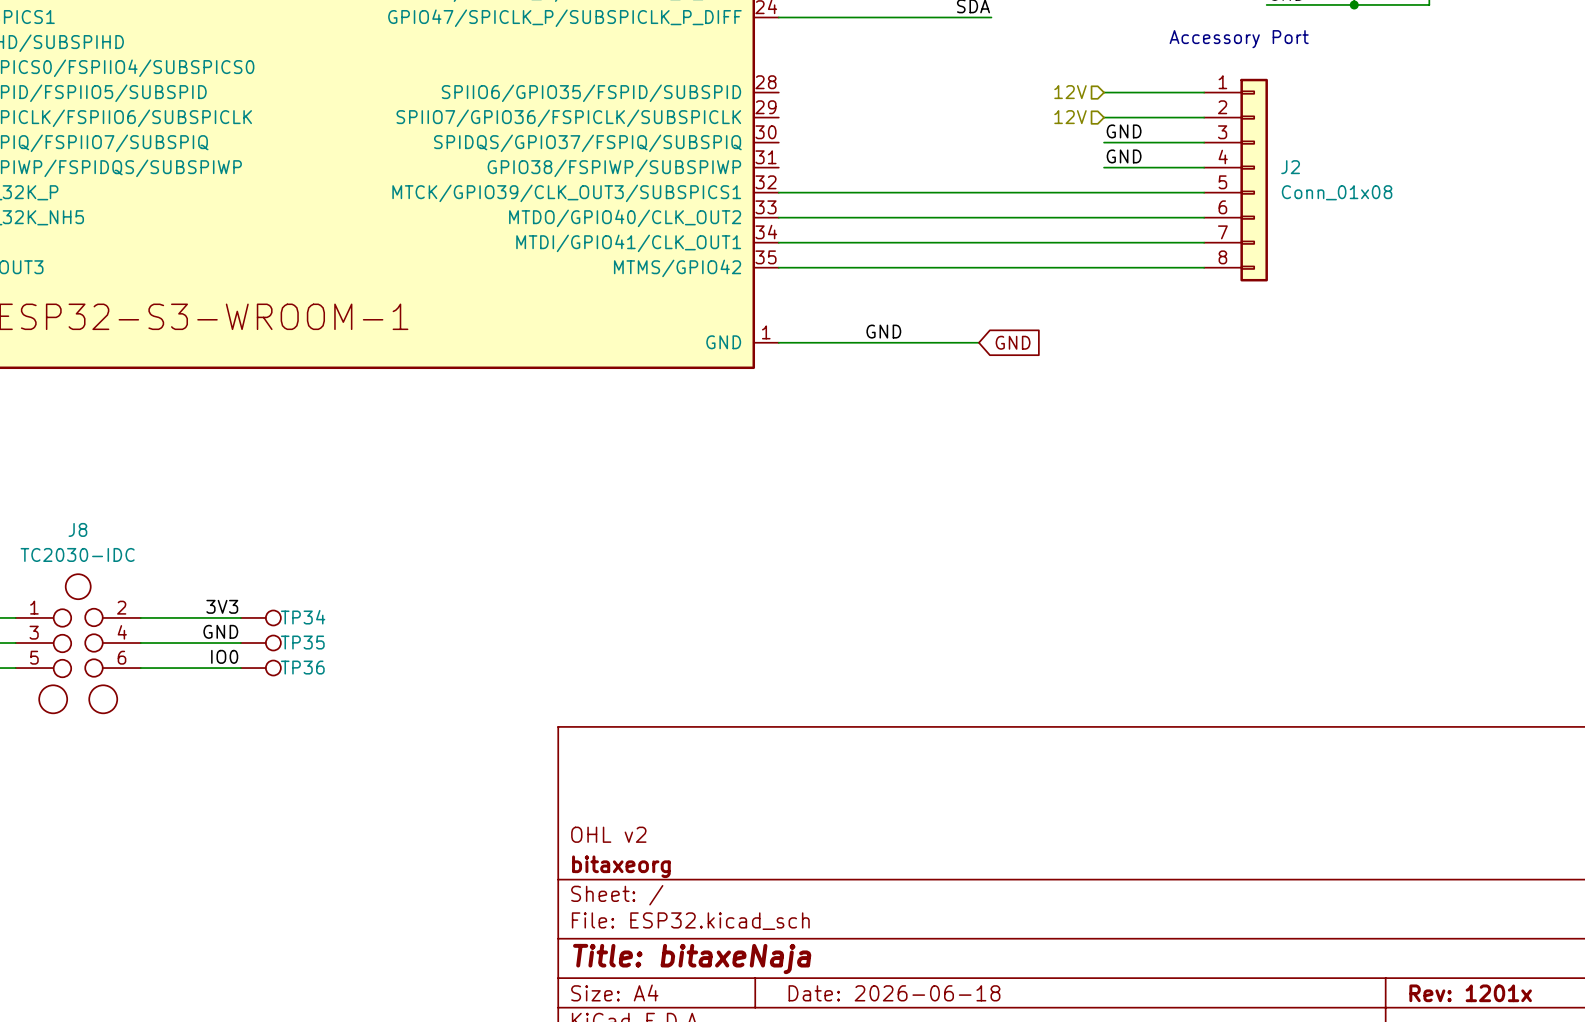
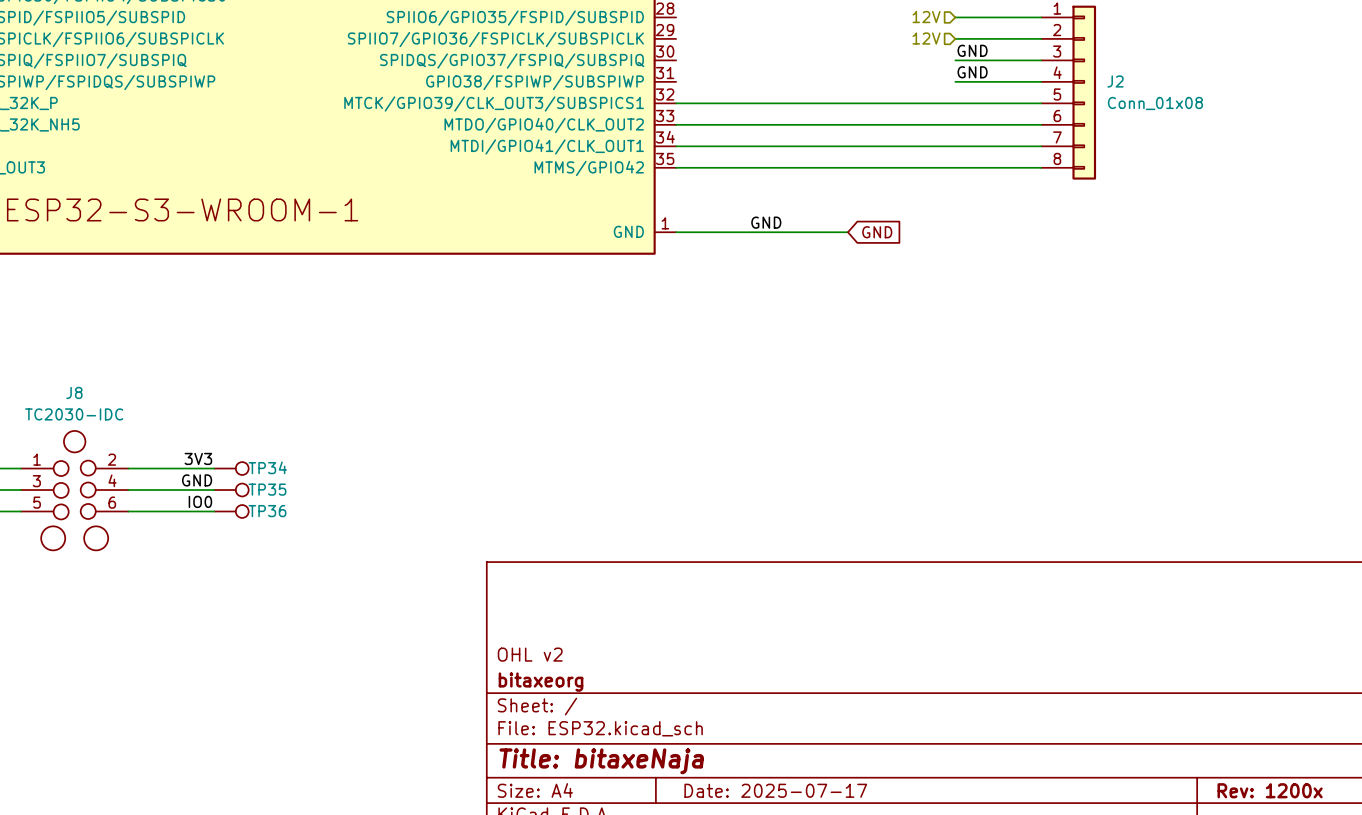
title block: Date: 2026-06-18 (894, 993) -> Date: 2025-07-17 (775, 790)
title block: Rev: 1201x (1470, 993) -> Rev: 1200x (1270, 790)

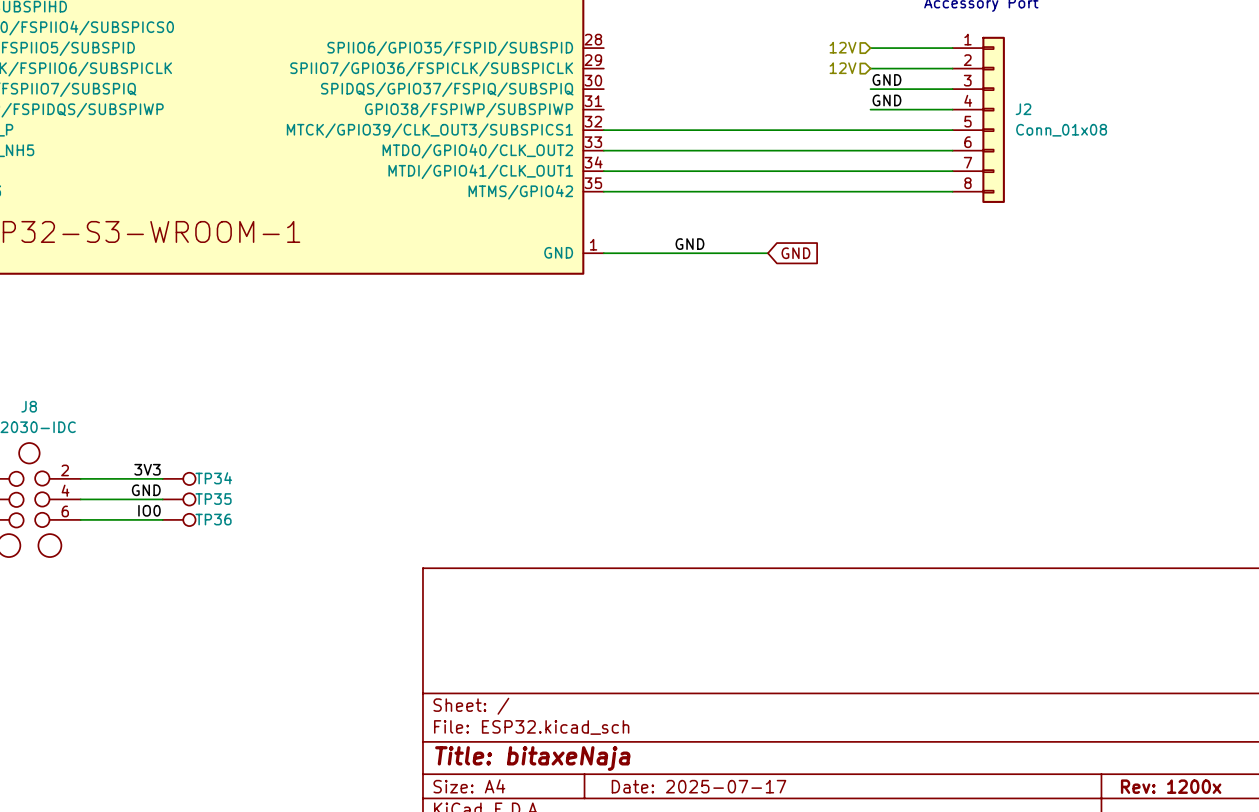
title block: OHL v2 (530, 654) -> none
title block: bitaxeorg (541, 682) -> none

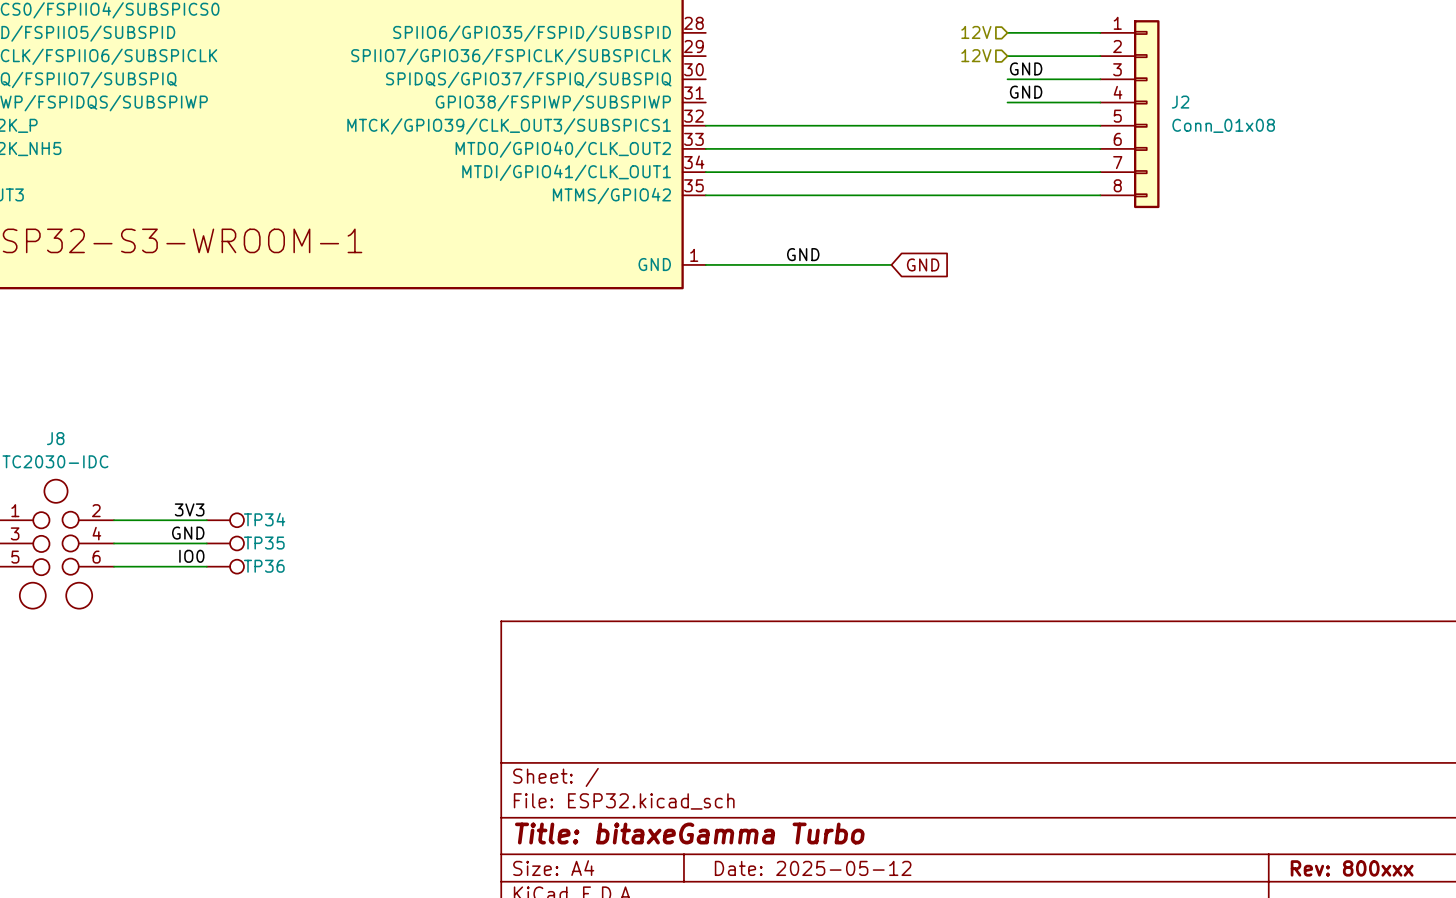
title block: Title: bitaxeNaja (532, 758) -> Title: bitaxeGamma Turbo (689, 833)
title block: Date: 2025-07-17 (698, 786) -> Date: 2025-05-12 (813, 868)
title block: Rev: 1200x (1171, 786) -> Rev: 800xxx (1352, 868)

